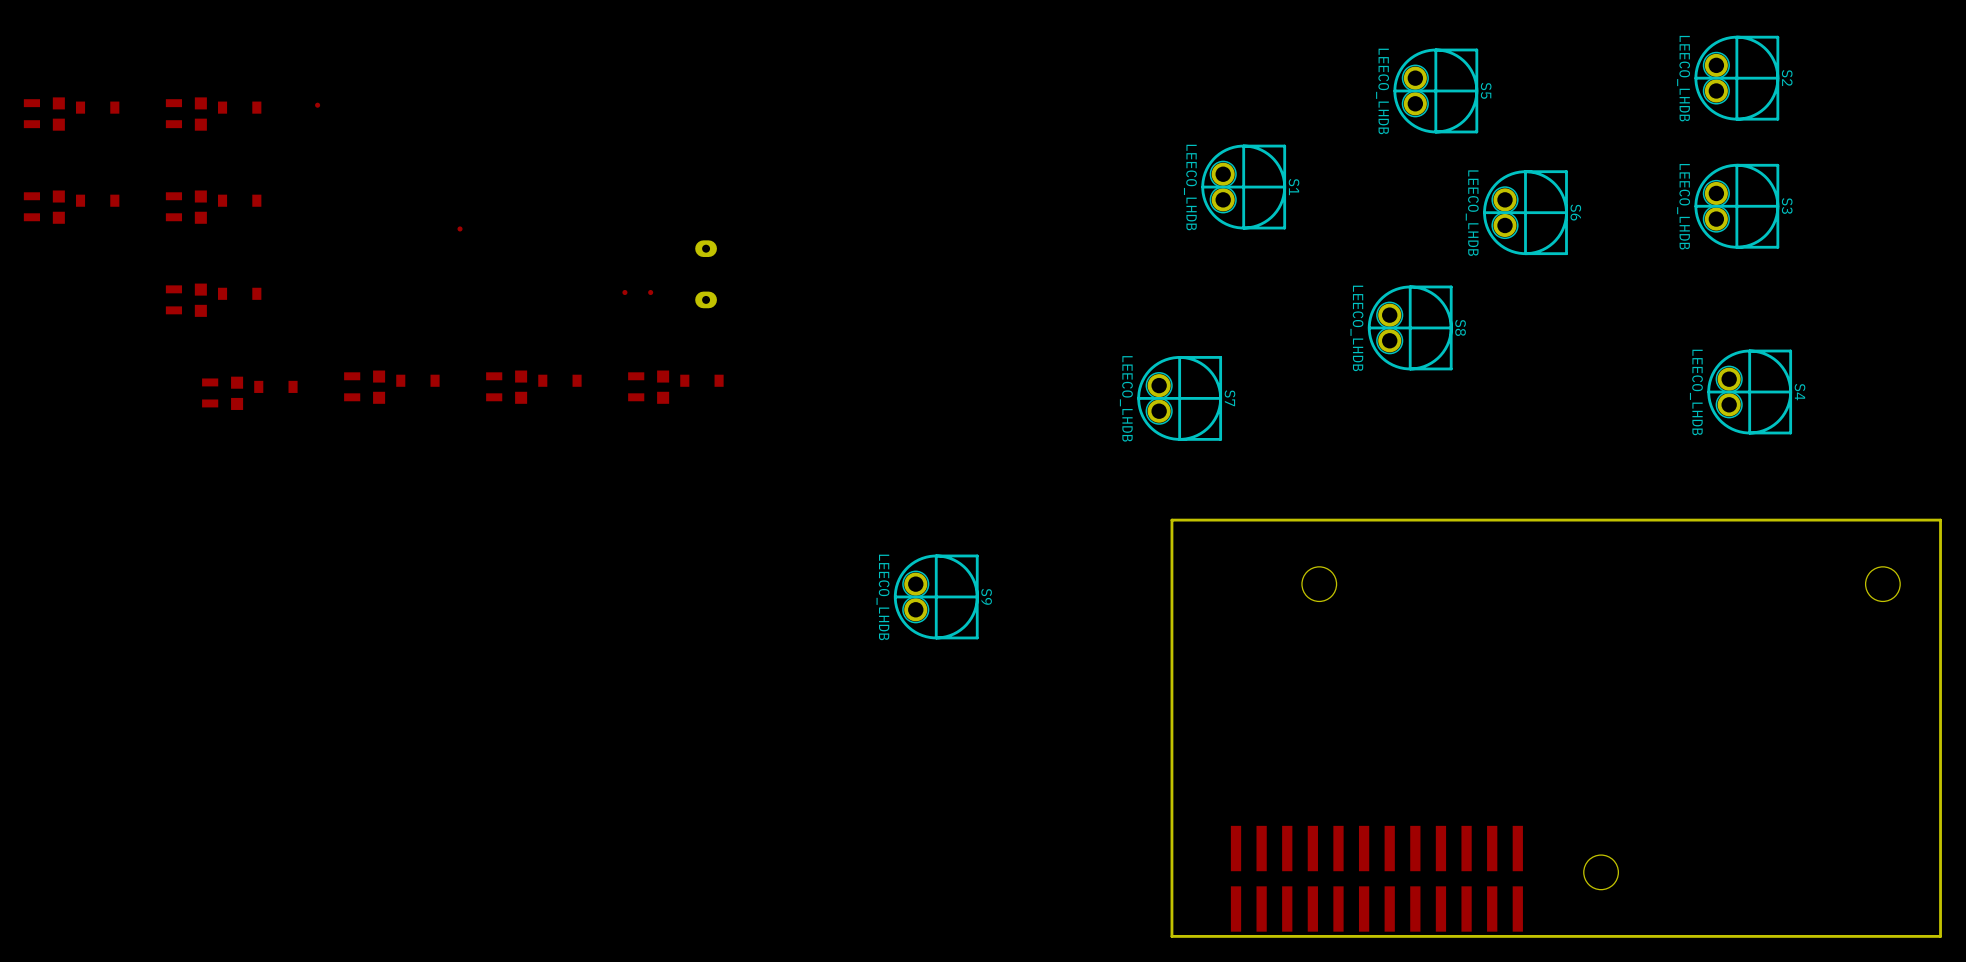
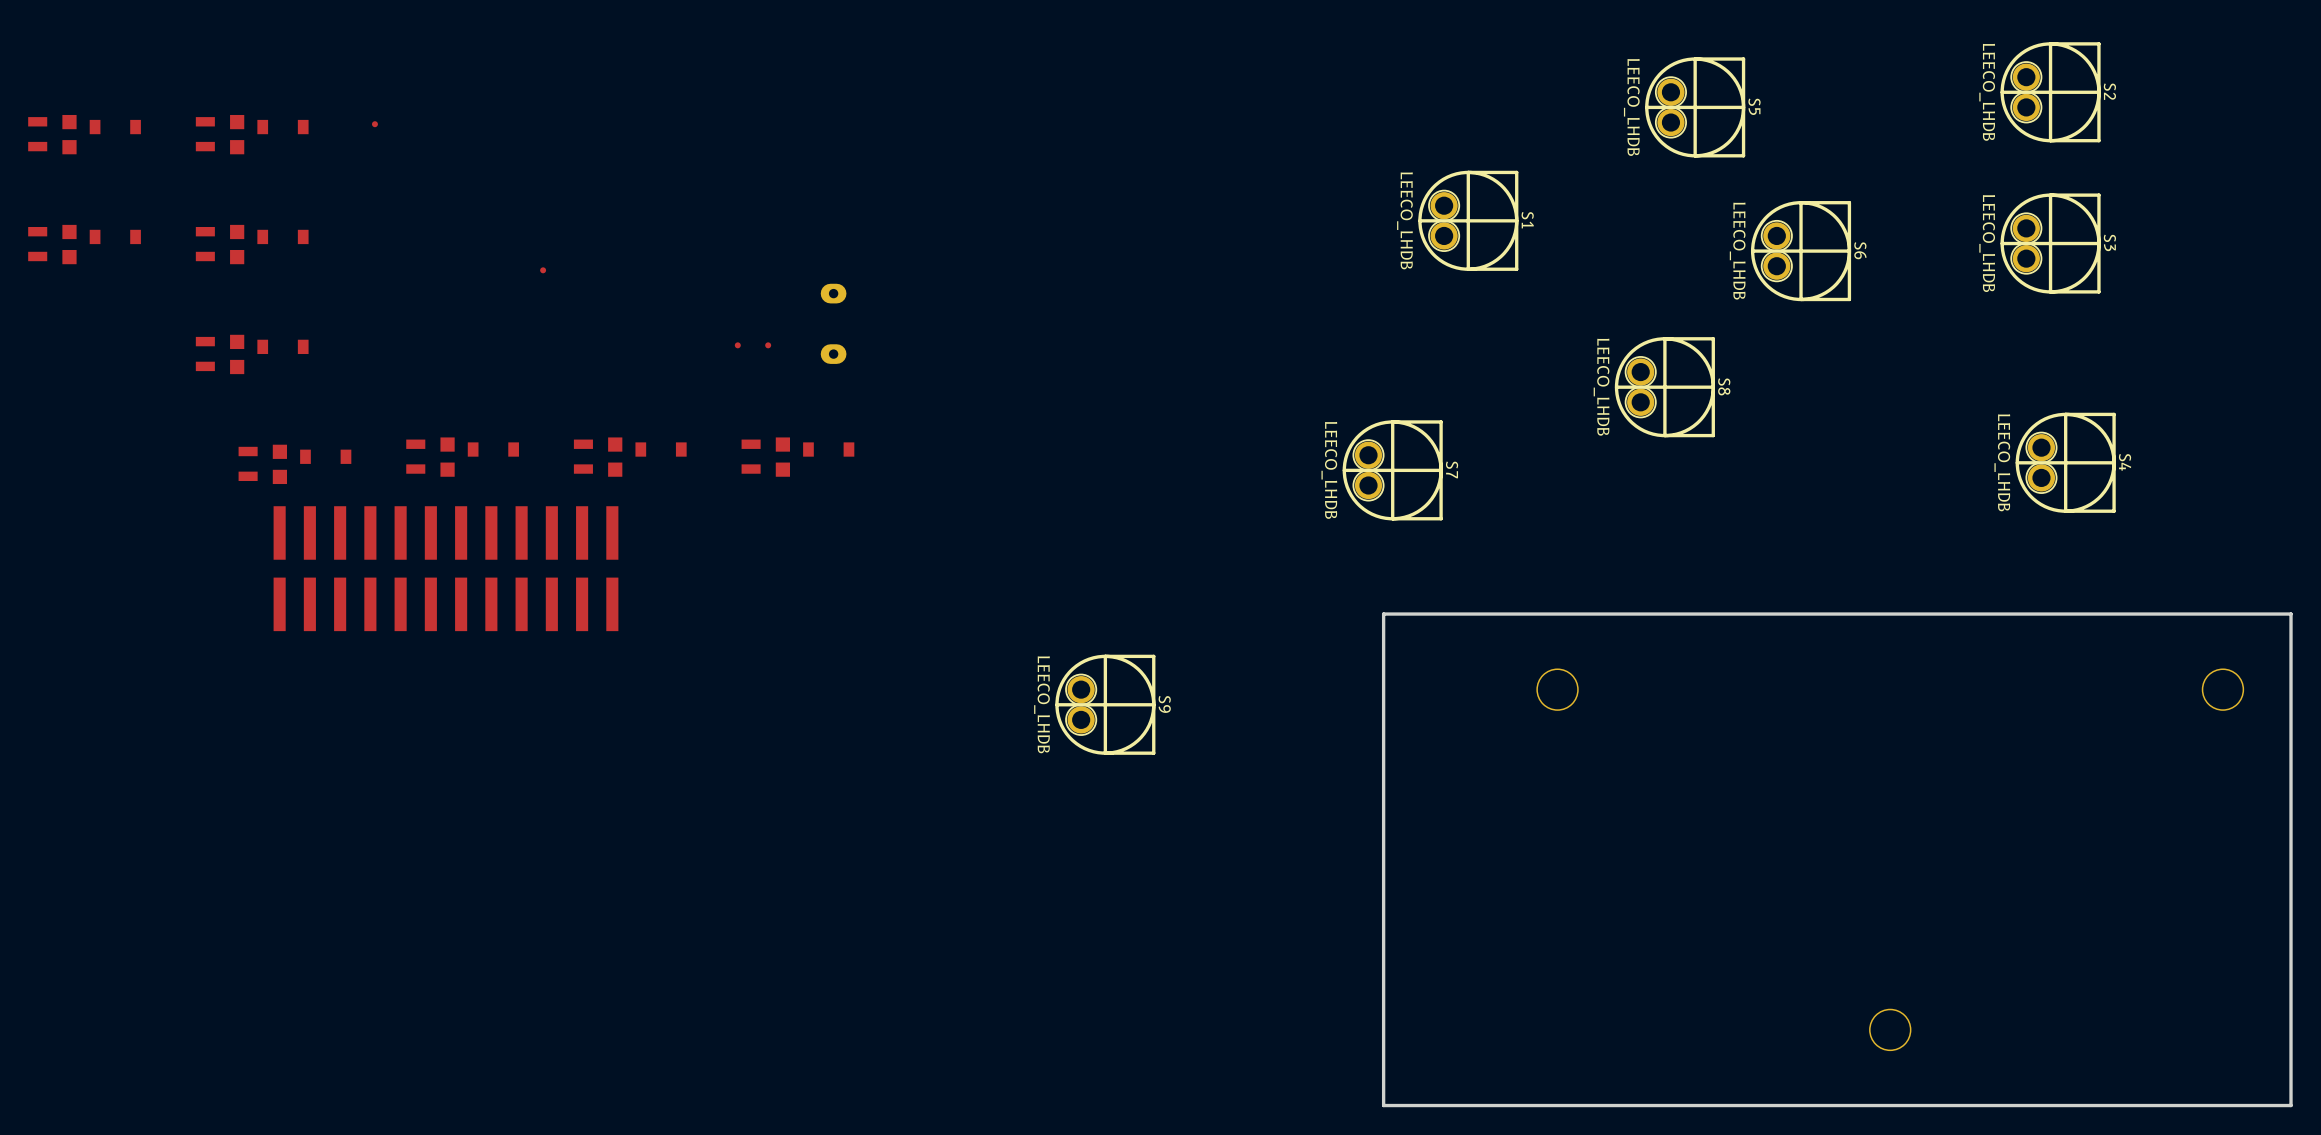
part: none -> (445, 568)
part: (1376, 878) -> none

